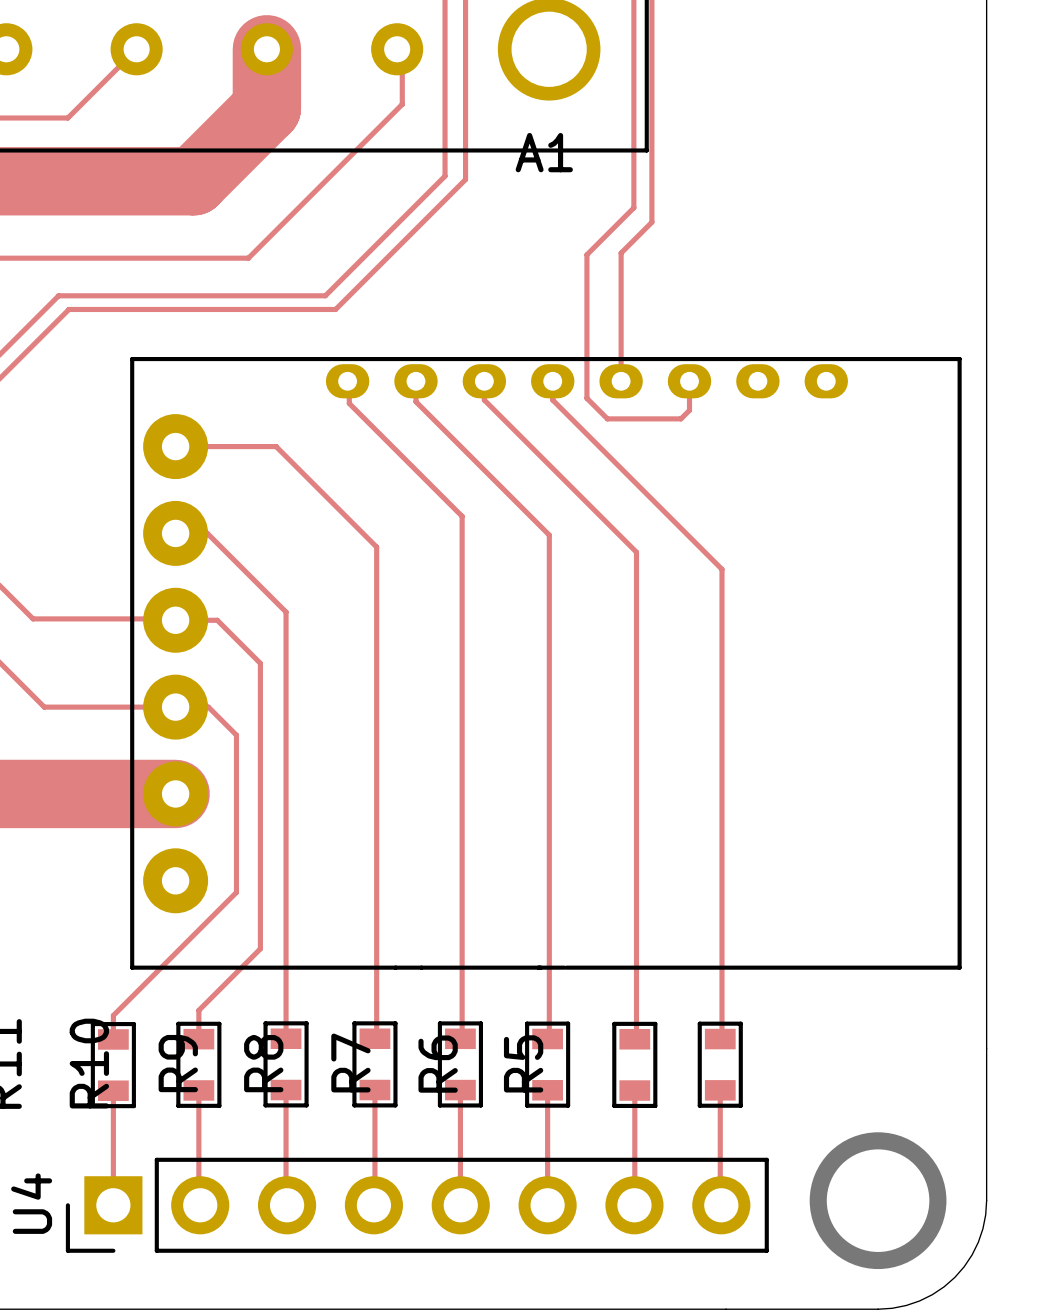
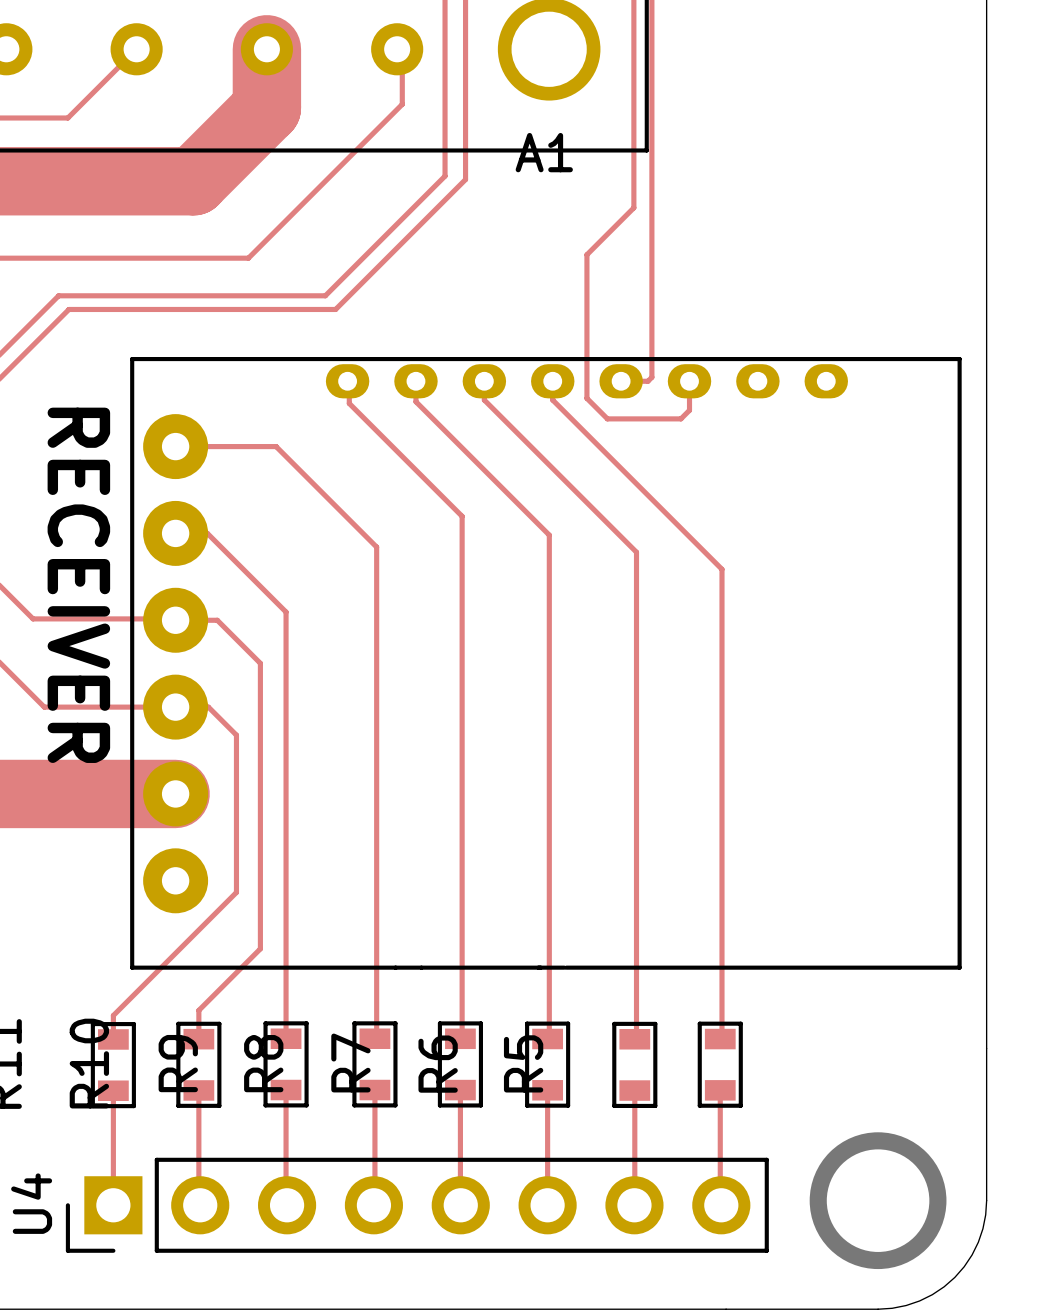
track: (651, 222) (621, 253) (621, 381) -> (651, 222) (651, 377) (647, 381) (621, 381)
text: none -> RECEIVER (78, 585)

